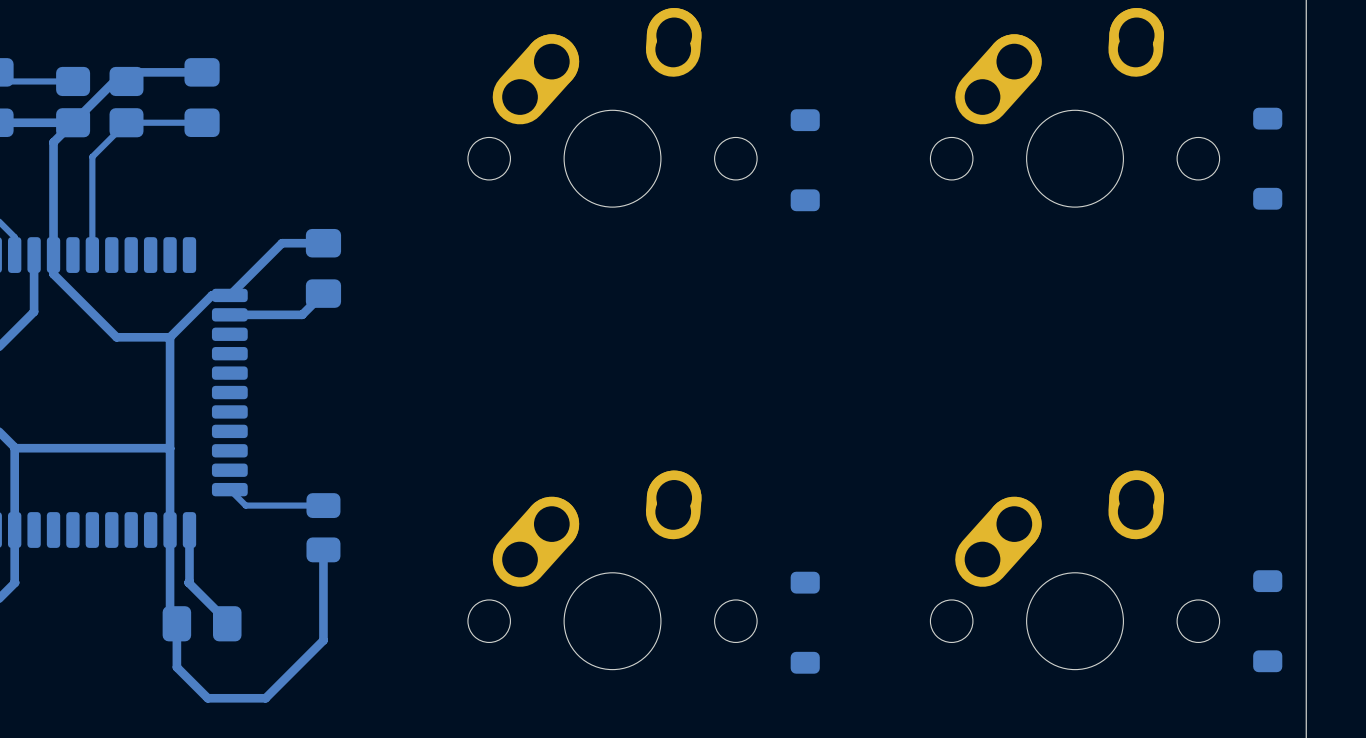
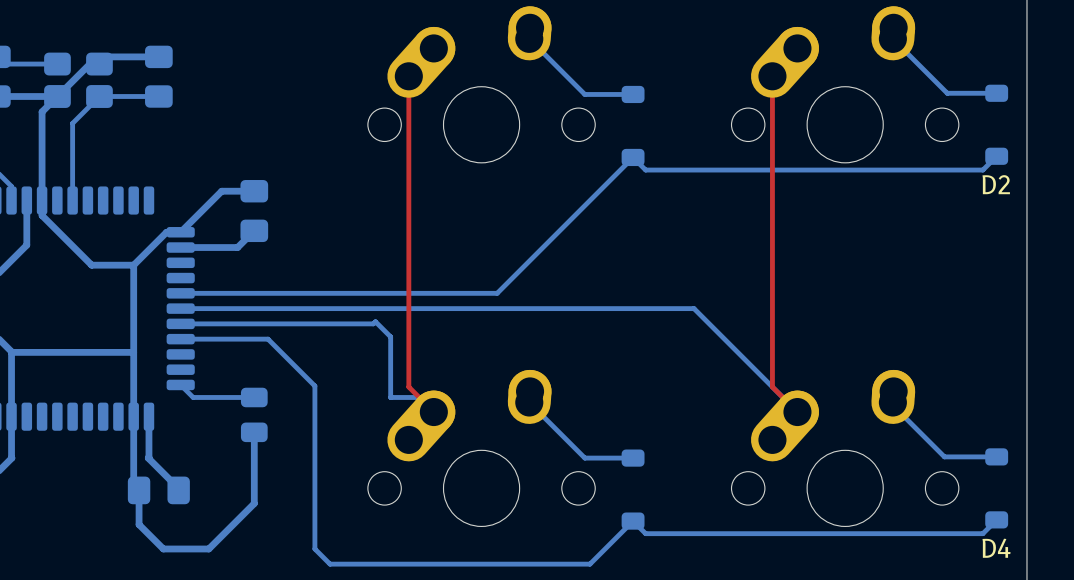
bottom track: none -> (529, 38) (584, 94) (633, 94)
bottom track: none -> (892, 38) (947, 93) (996, 93)
top track: none -> (408, 76) (408, 387) (433, 412)
top track: none -> (772, 76) (772, 387) (797, 412)
bottom track: none -> (996, 156) (982, 170) (645, 170) (633, 157) (497, 293) (180, 293)
D2 name: none -> D2 (996, 184)
bottom track: none -> (180, 308) (694, 308) (797, 412)
bottom track: none -> (180, 323) (373, 323) (375, 321) (390, 336) (390, 397) (419, 397) (433, 412)
bottom track: none -> (180, 339) (268, 339) (314, 386) (314, 548) (330, 564) (590, 564) (633, 521) (645, 533) (982, 533) (996, 519)
bottom track: none -> (529, 402) (584, 458) (633, 458)
bottom track: none -> (892, 402) (892, 405) (944, 456) (996, 456)
D4 name: none -> D4 (996, 548)

